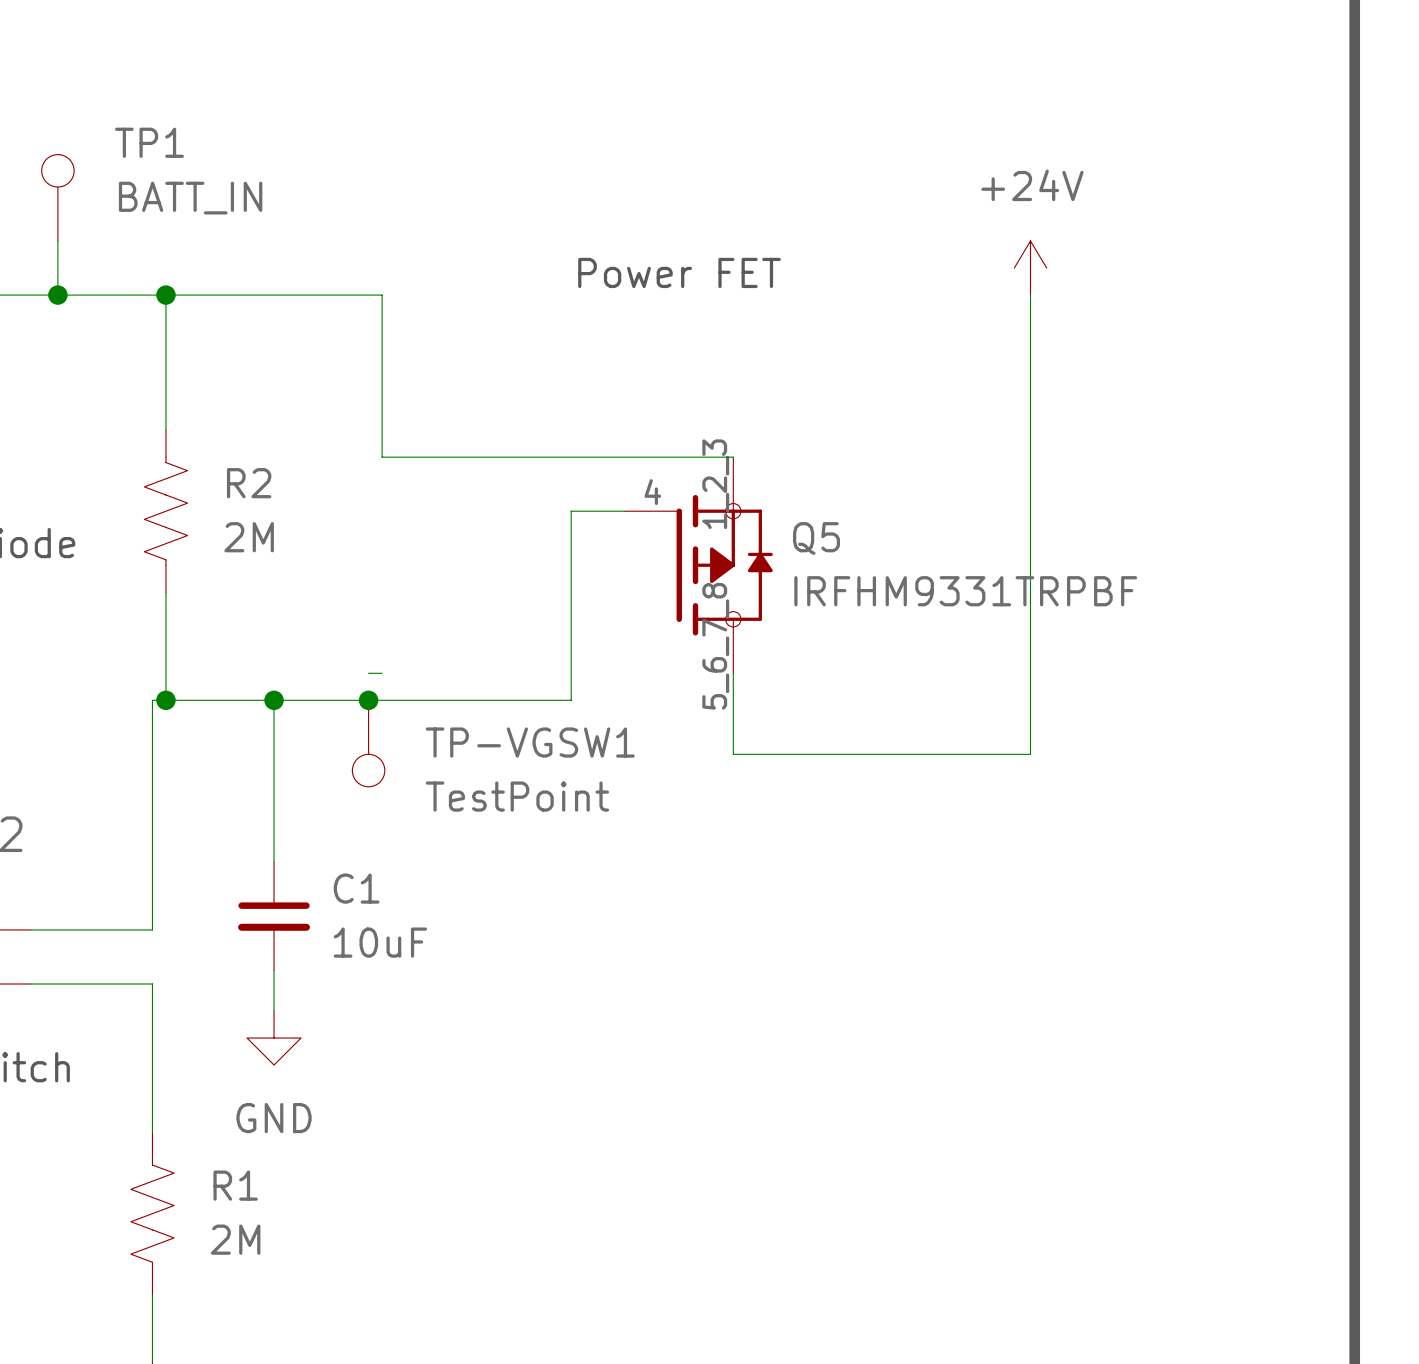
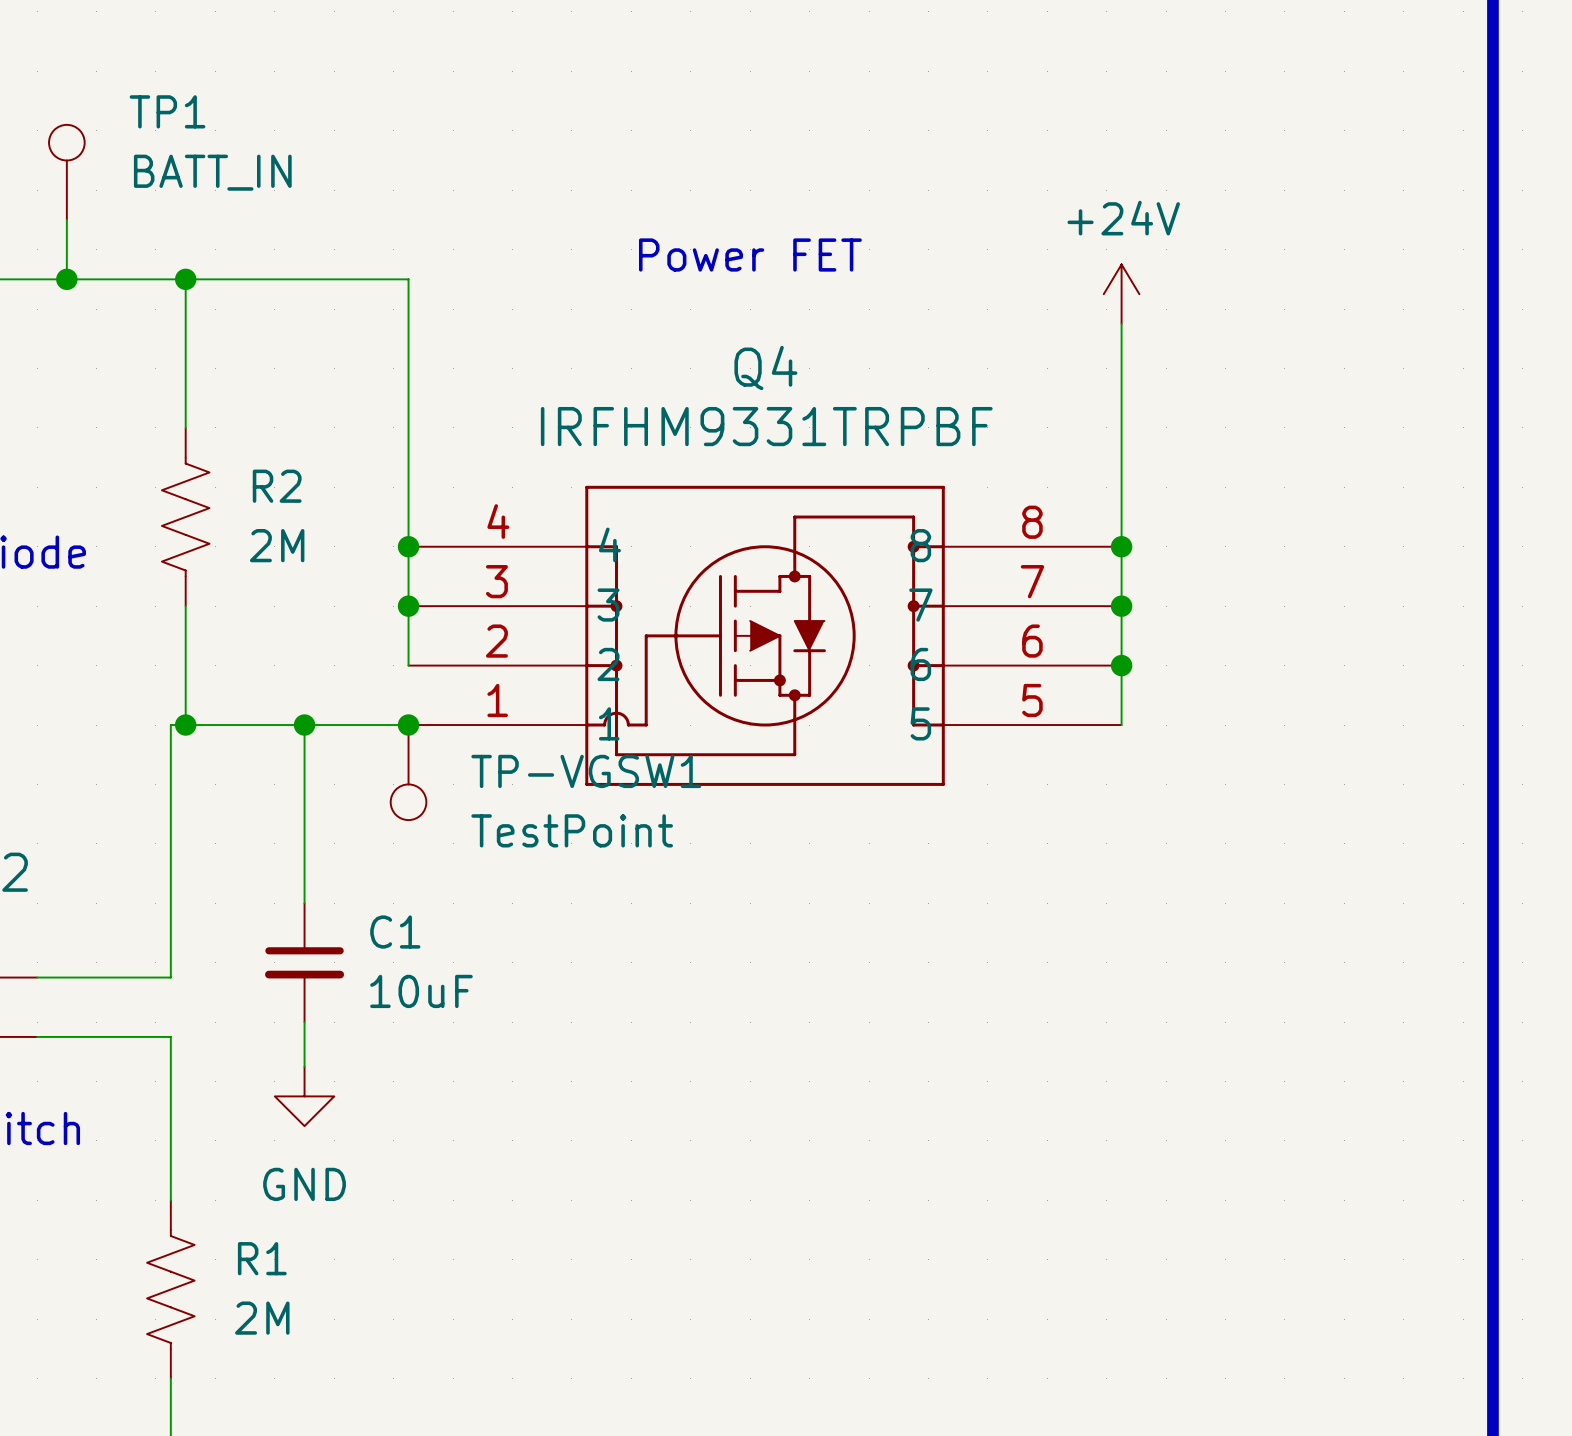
power symbol text position: +24V (1032, 185) -> +24V (1123, 218)
power symbol position: +24V (1030, 268) -> +24V (1121, 294)
wire: (368, 295) (382, 295) (382, 457) (733, 457) -> (408, 279) (408, 665)
wire: (1030, 295) (1030, 754) (733, 754) (733, 673) -> none
wire: none -> (1121, 323) (1121, 725)
wire: (625, 511) (571, 511) (571, 700) (368, 700) -> none
junction: none -> (408, 546)
junction: none -> (1121, 546)
Q5: IRFHM9331TRPBF (699, 565) -> none
junction: none -> (408, 606)
junction: none -> (1121, 606)
Q4: none -> IRFHM9331TRPBF (765, 635)
junction: none -> (1121, 665)
wire: (368, 673) (382, 673) -> none

